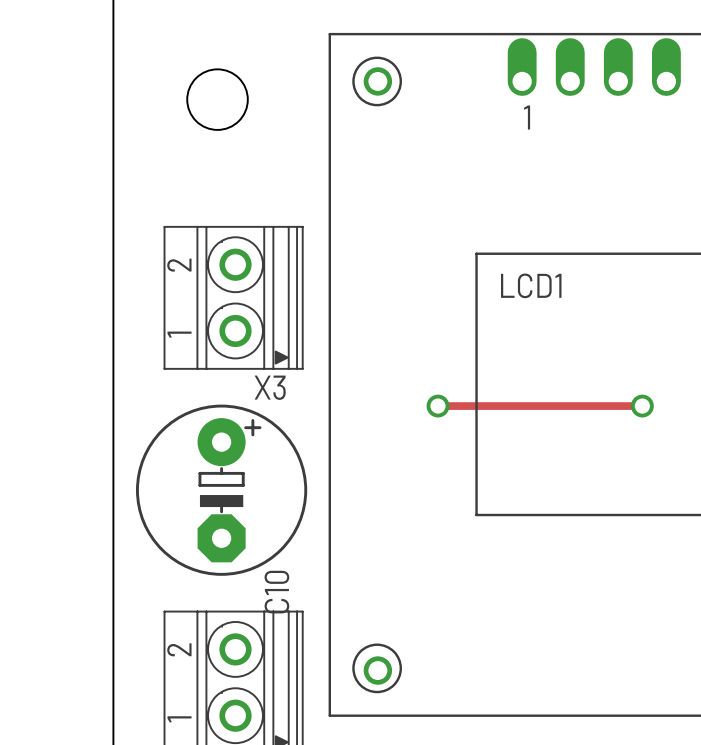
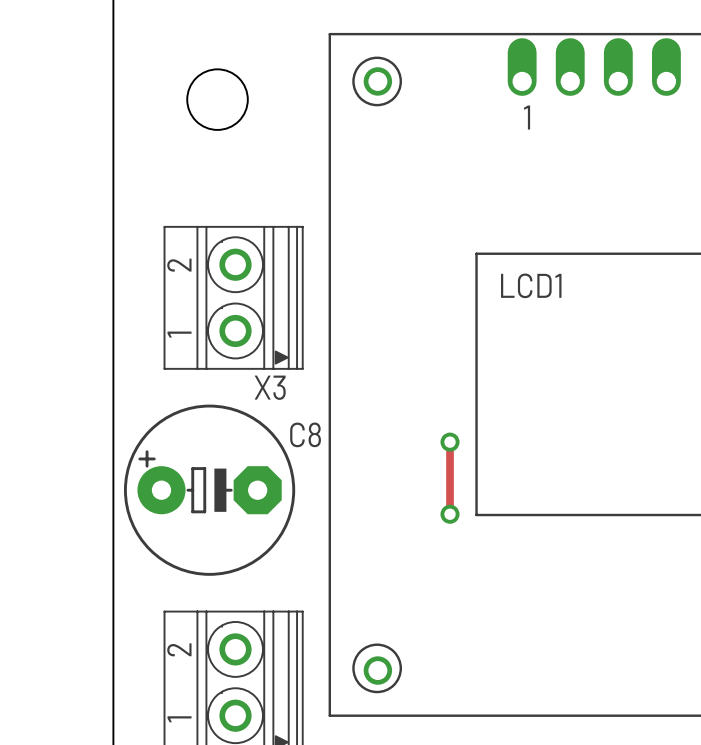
track: (438, 406) (642, 406) -> none
via: (438, 406) -> none
via: (642, 406) -> none
track: none -> (450, 442) (450, 514)
via: none -> (450, 442)
C8: none -> (209, 490)
C10: (221, 490) -> none
via: none -> (450, 514)

